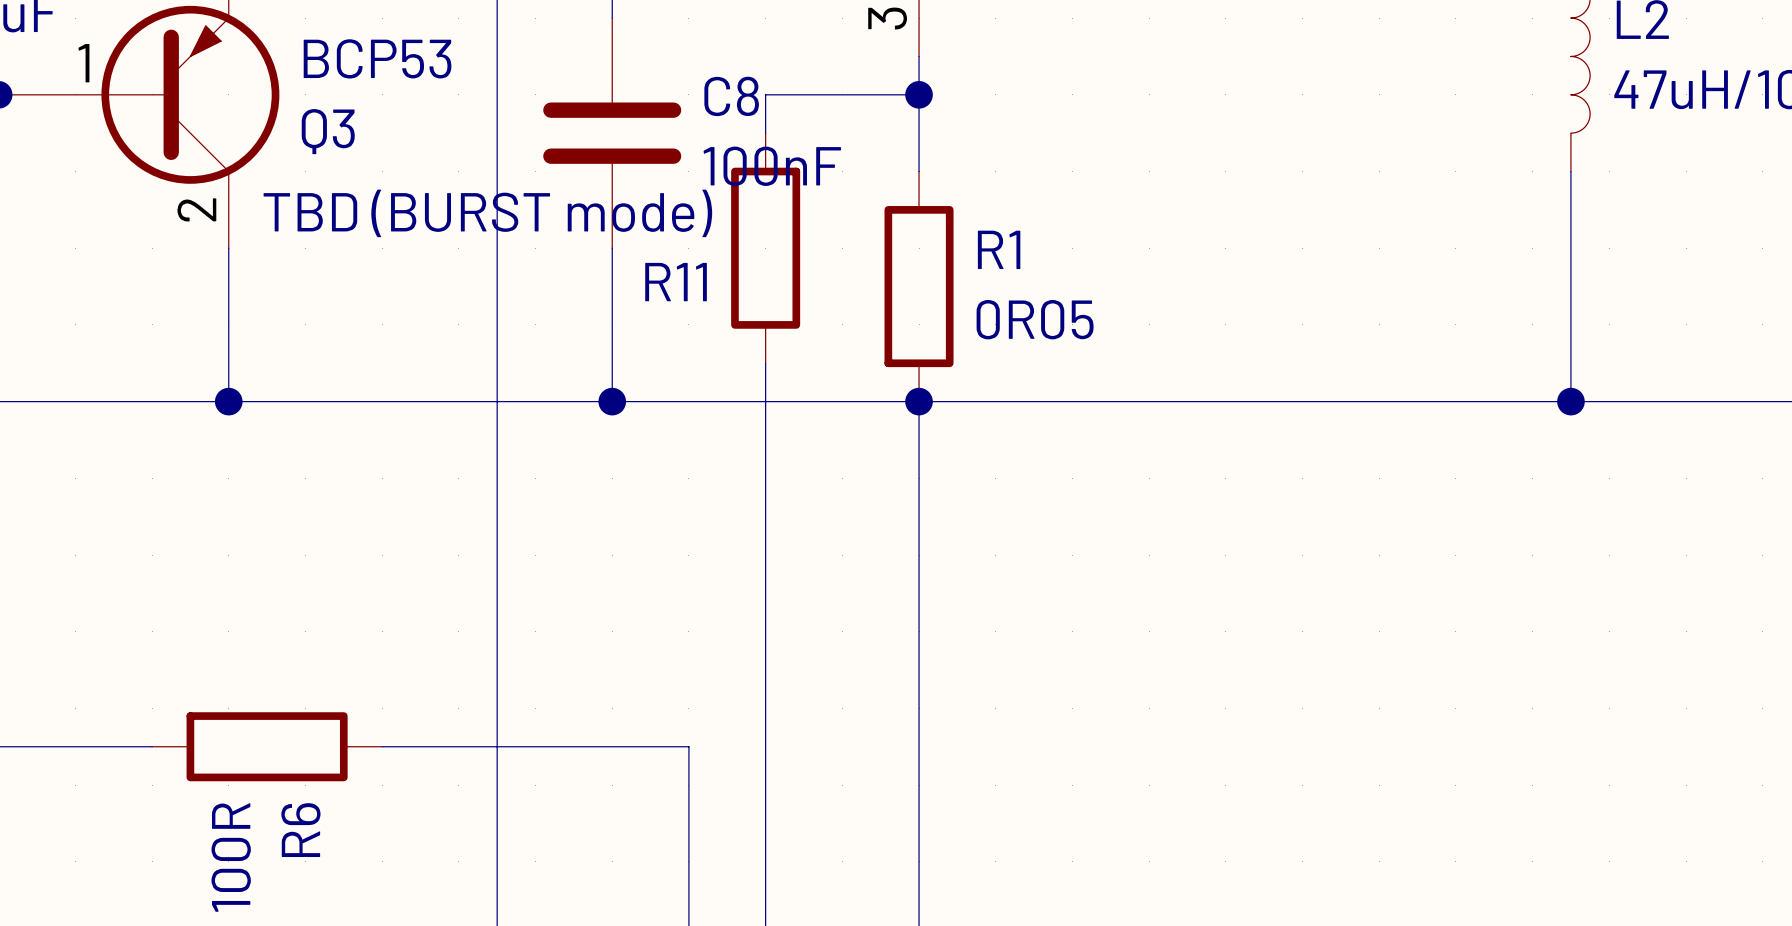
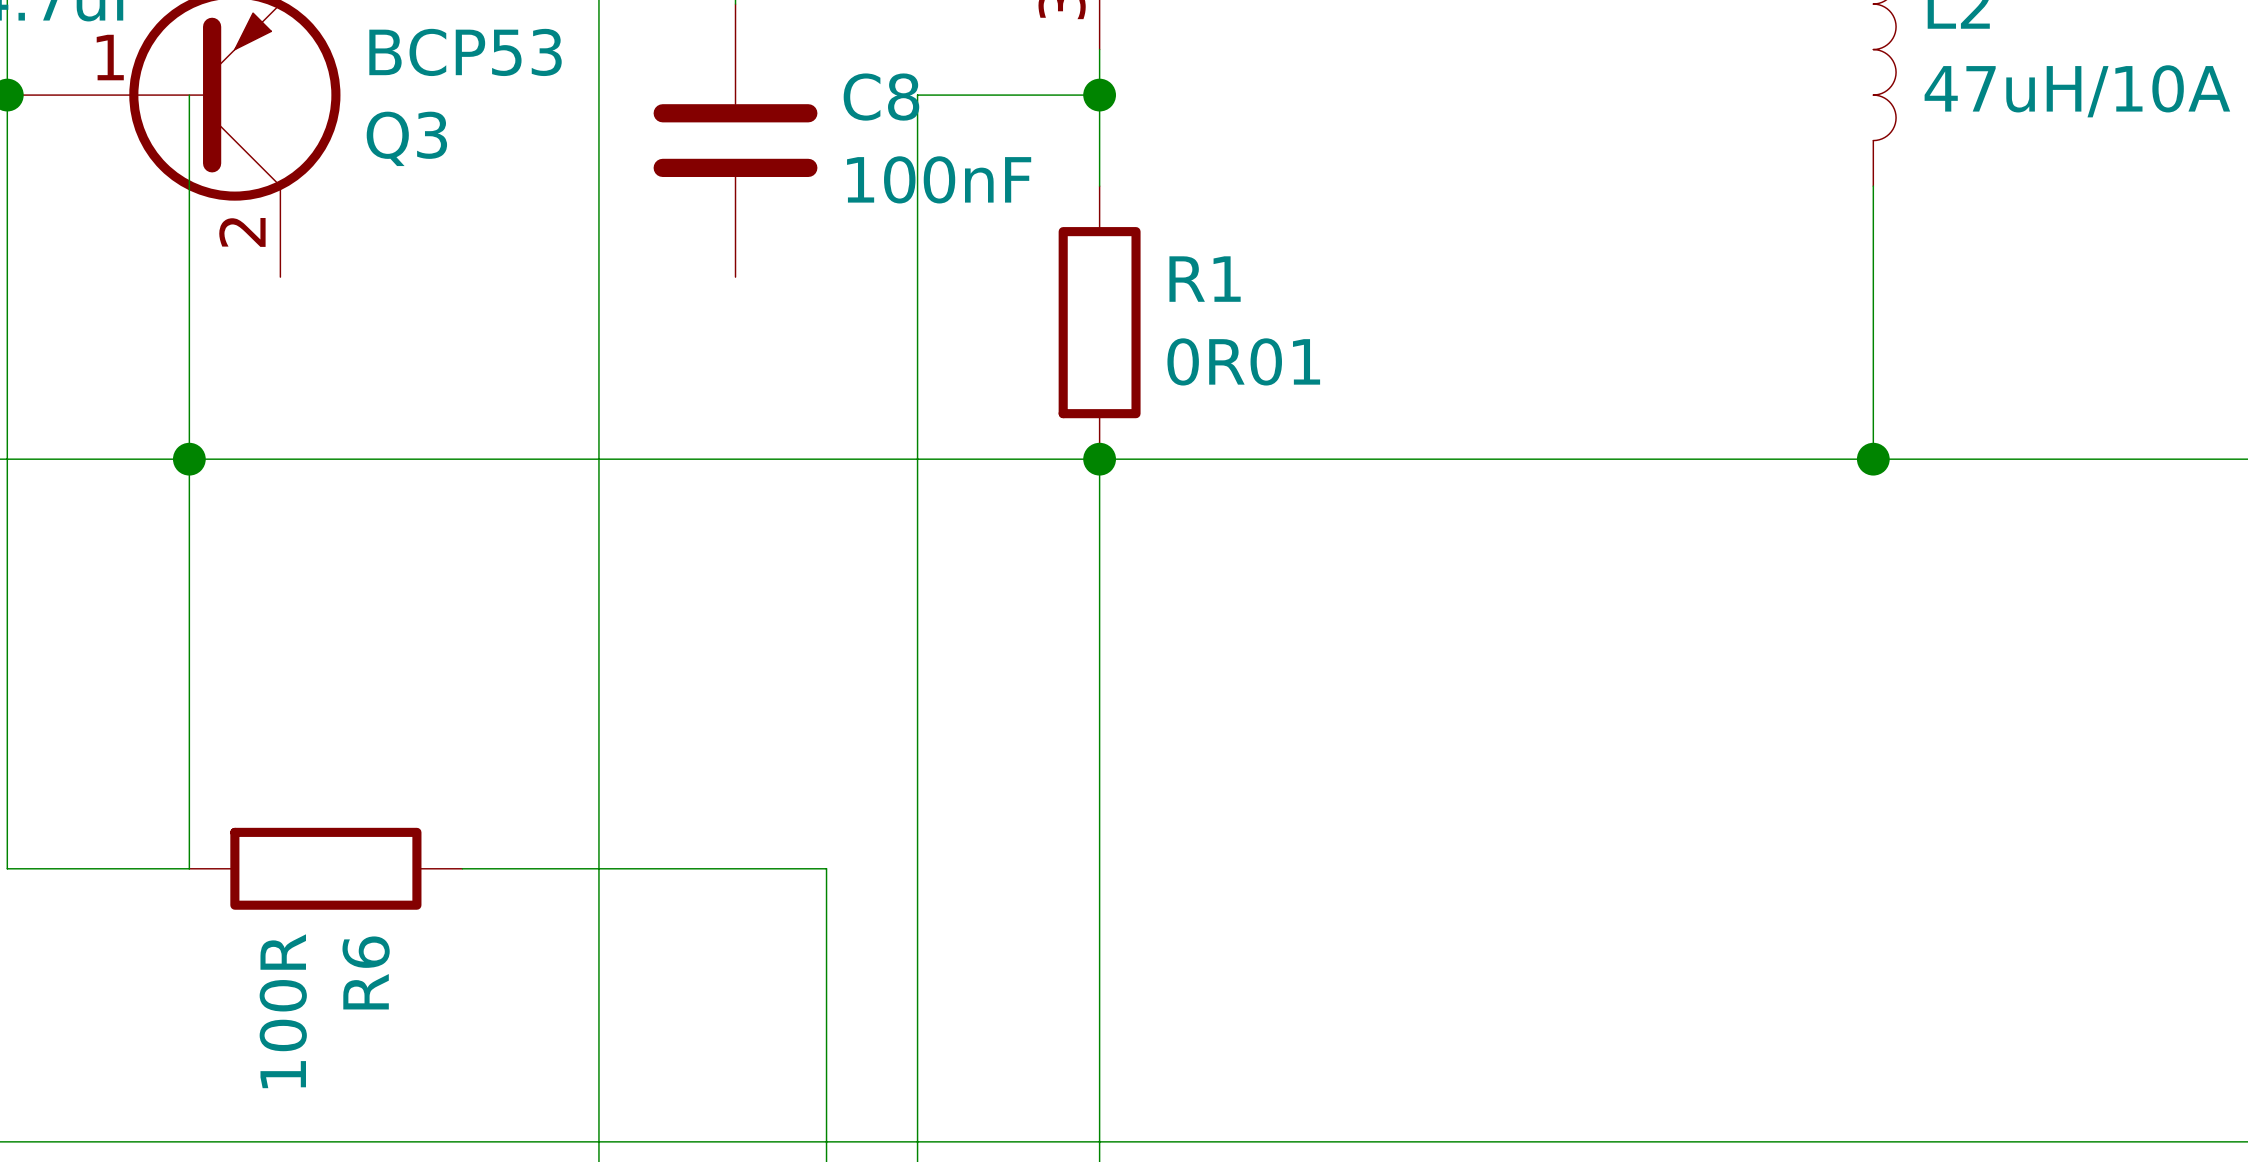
wire: none -> (189, 95) (189, 868)
wire: none -> (917, 140) (917, 413)
wire: (228, 248) (228, 401) -> none
wire: (612, 248) (612, 401) -> none
R11: TBD (BURST mode) (765, 248) -> none
R1 value: 0R05 (1035, 319) -> 0R01 (1243, 361)
junction position: (228, 401) -> (189, 459)
junction: (612, 401) -> none

